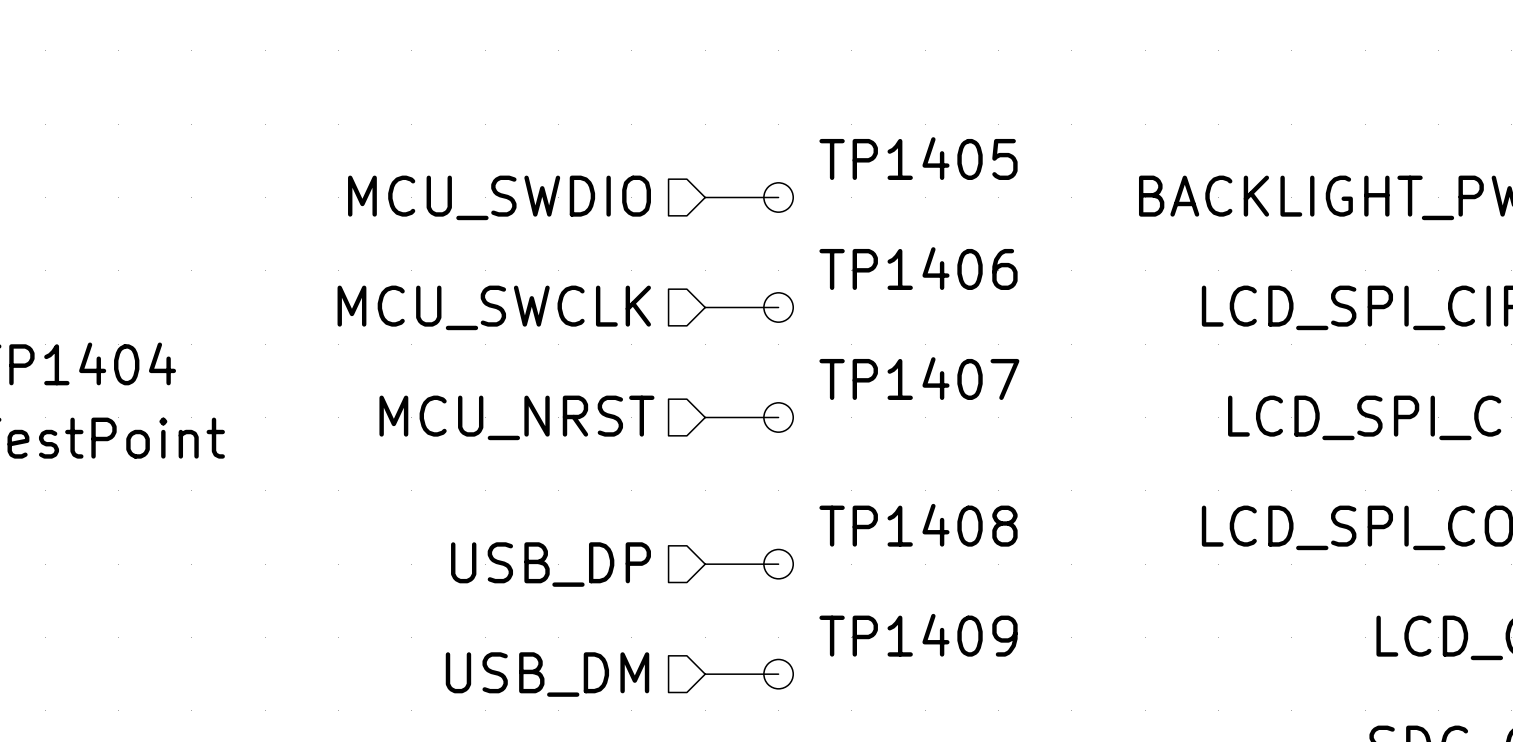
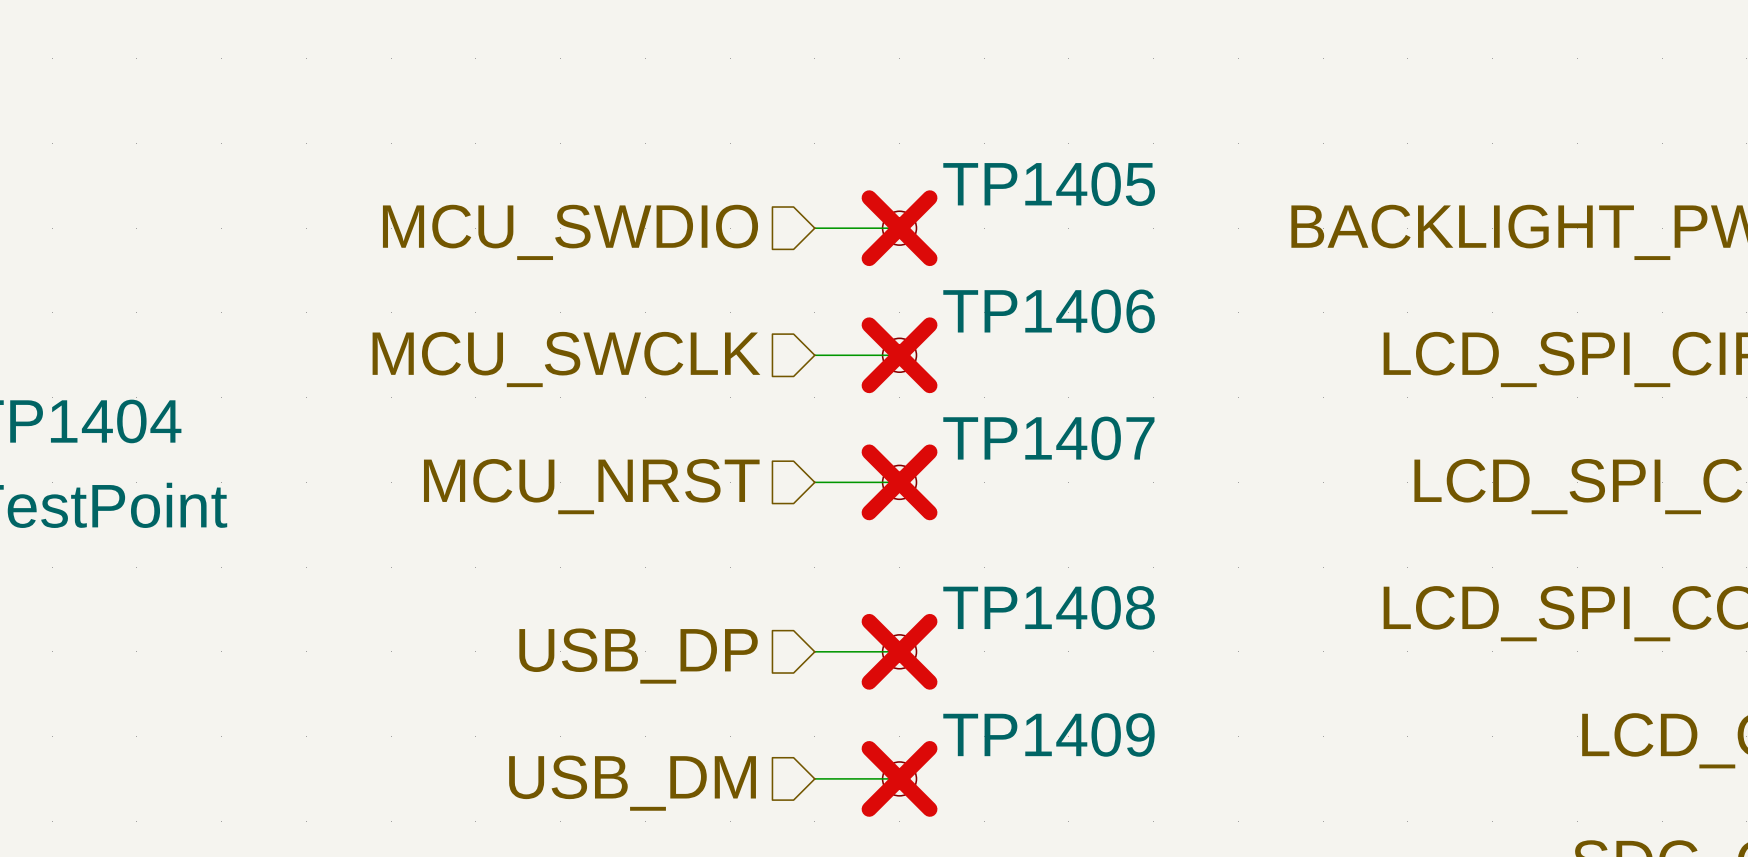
TP1405 do-not-place cross: none -> (899, 228)
TP1406 do-not-place cross: none -> (899, 355)
TP1407 do-not-place cross: none -> (899, 482)
TP1408 do-not-place cross: none -> (899, 651)
TP1409 do-not-place cross: none -> (899, 778)

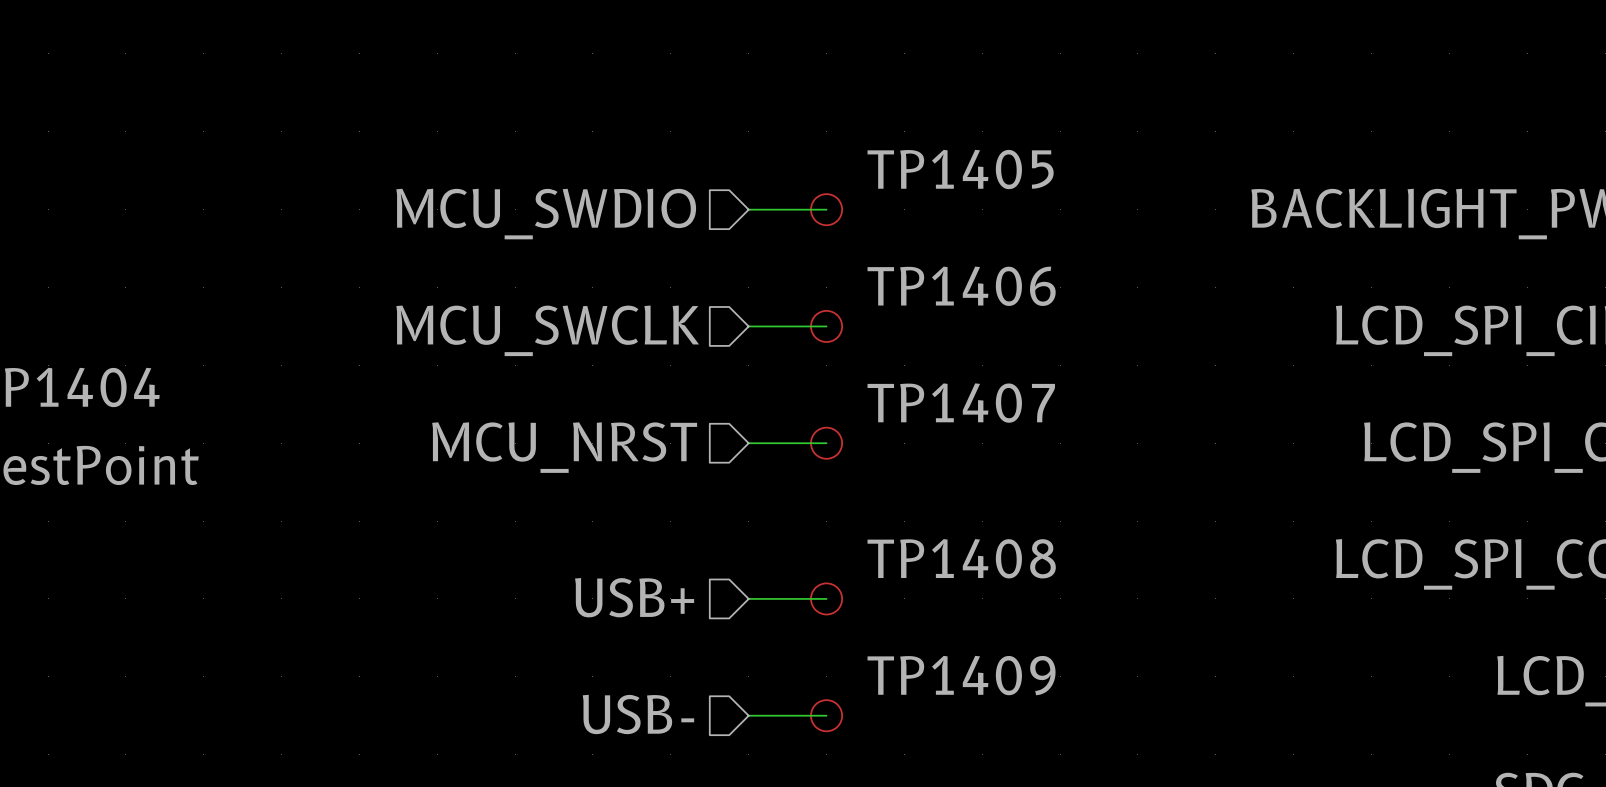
TP1405 do-not-place cross: (899, 228) -> none
TP1406 do-not-place cross: (899, 355) -> none
TP1407 do-not-place cross: (899, 482) -> none
TP1408 do-not-place cross: (899, 651) -> none
hierarchical label: USB_DP (638, 656) -> USB+ (634, 597)
TP1409 do-not-place cross: (899, 778) -> none
hierarchical label: USB_DM (632, 783) -> USB- (638, 714)

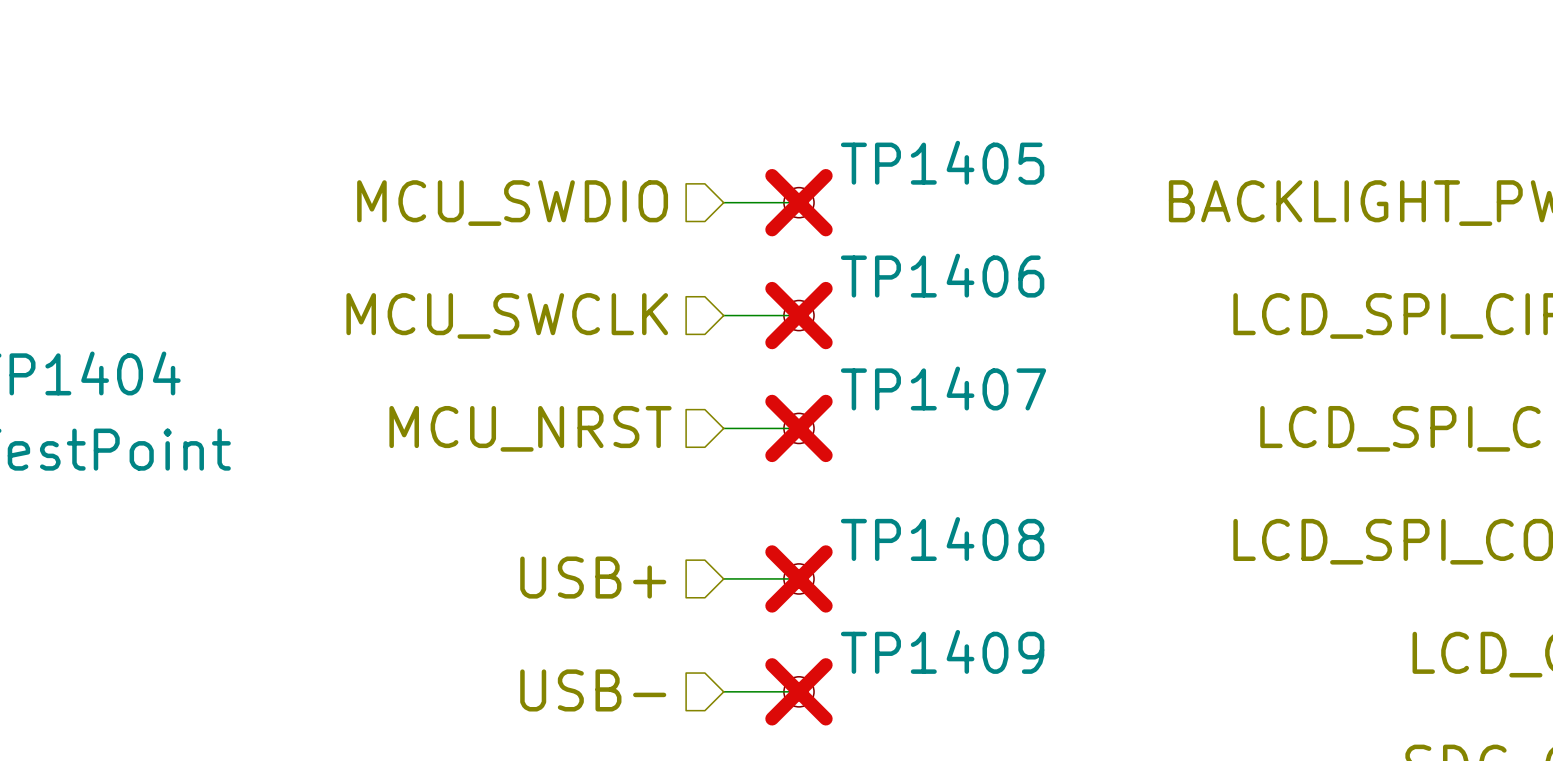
TP1405 do-not-place cross: none -> (798, 202)
TP1406 do-not-place cross: none -> (798, 315)
TP1407 do-not-place cross: none -> (798, 428)
TP1408 do-not-place cross: none -> (798, 578)
TP1409 do-not-place cross: none -> (798, 691)

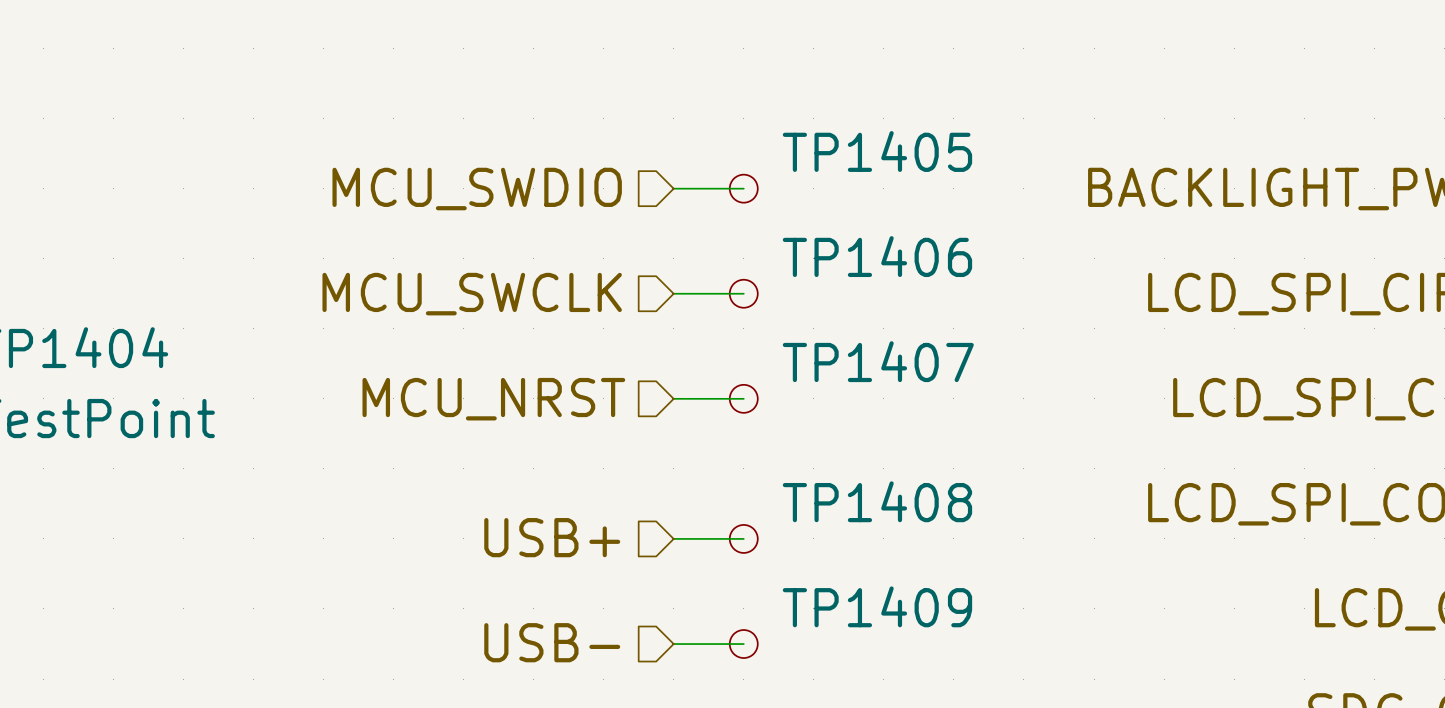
TP1405 do-not-place cross: (798, 202) -> none
TP1406 do-not-place cross: (798, 315) -> none
TP1407 do-not-place cross: (798, 428) -> none
TP1408 do-not-place cross: (798, 578) -> none
TP1409 do-not-place cross: (798, 691) -> none

